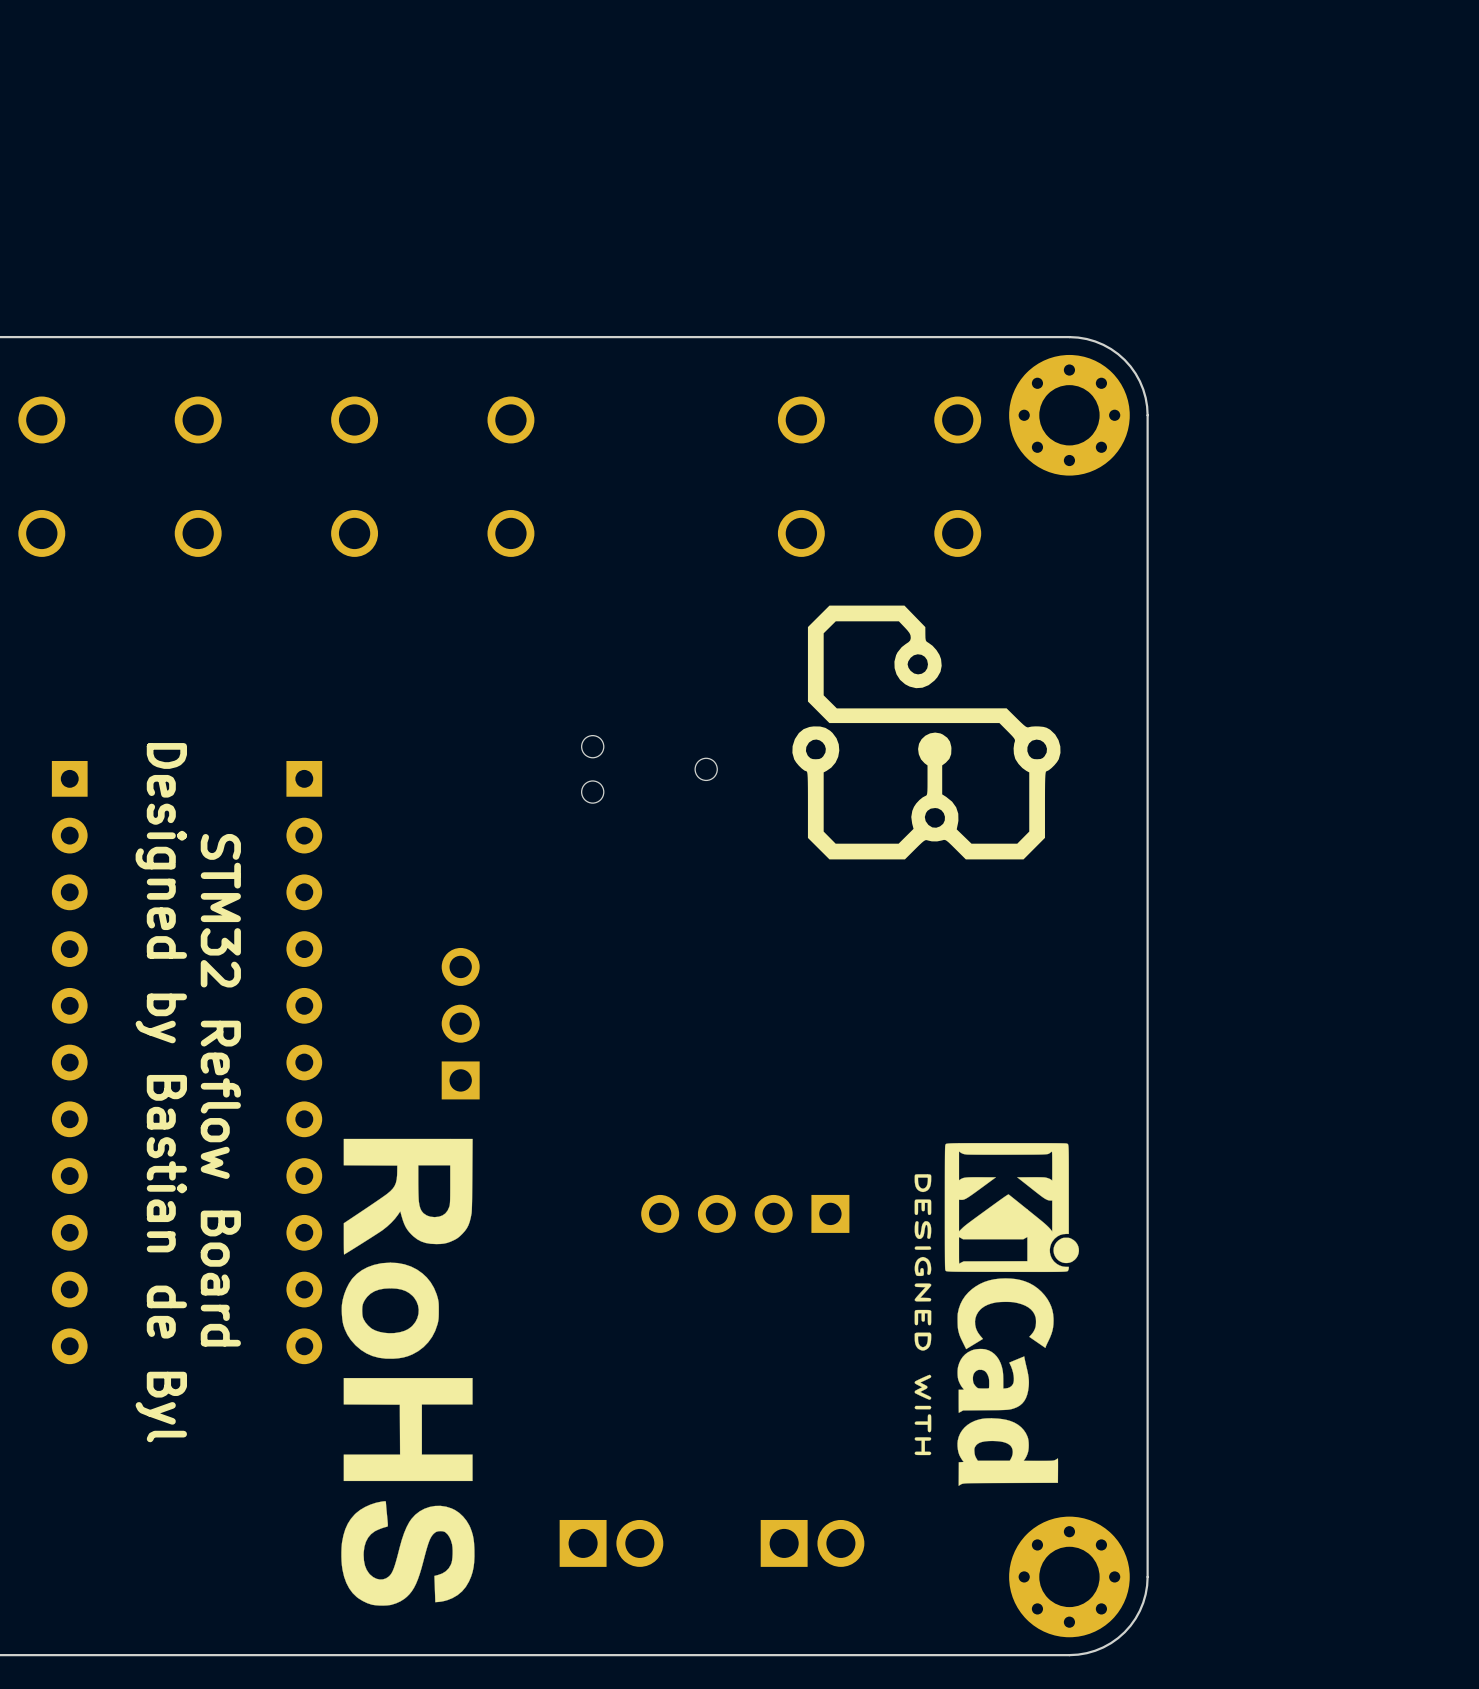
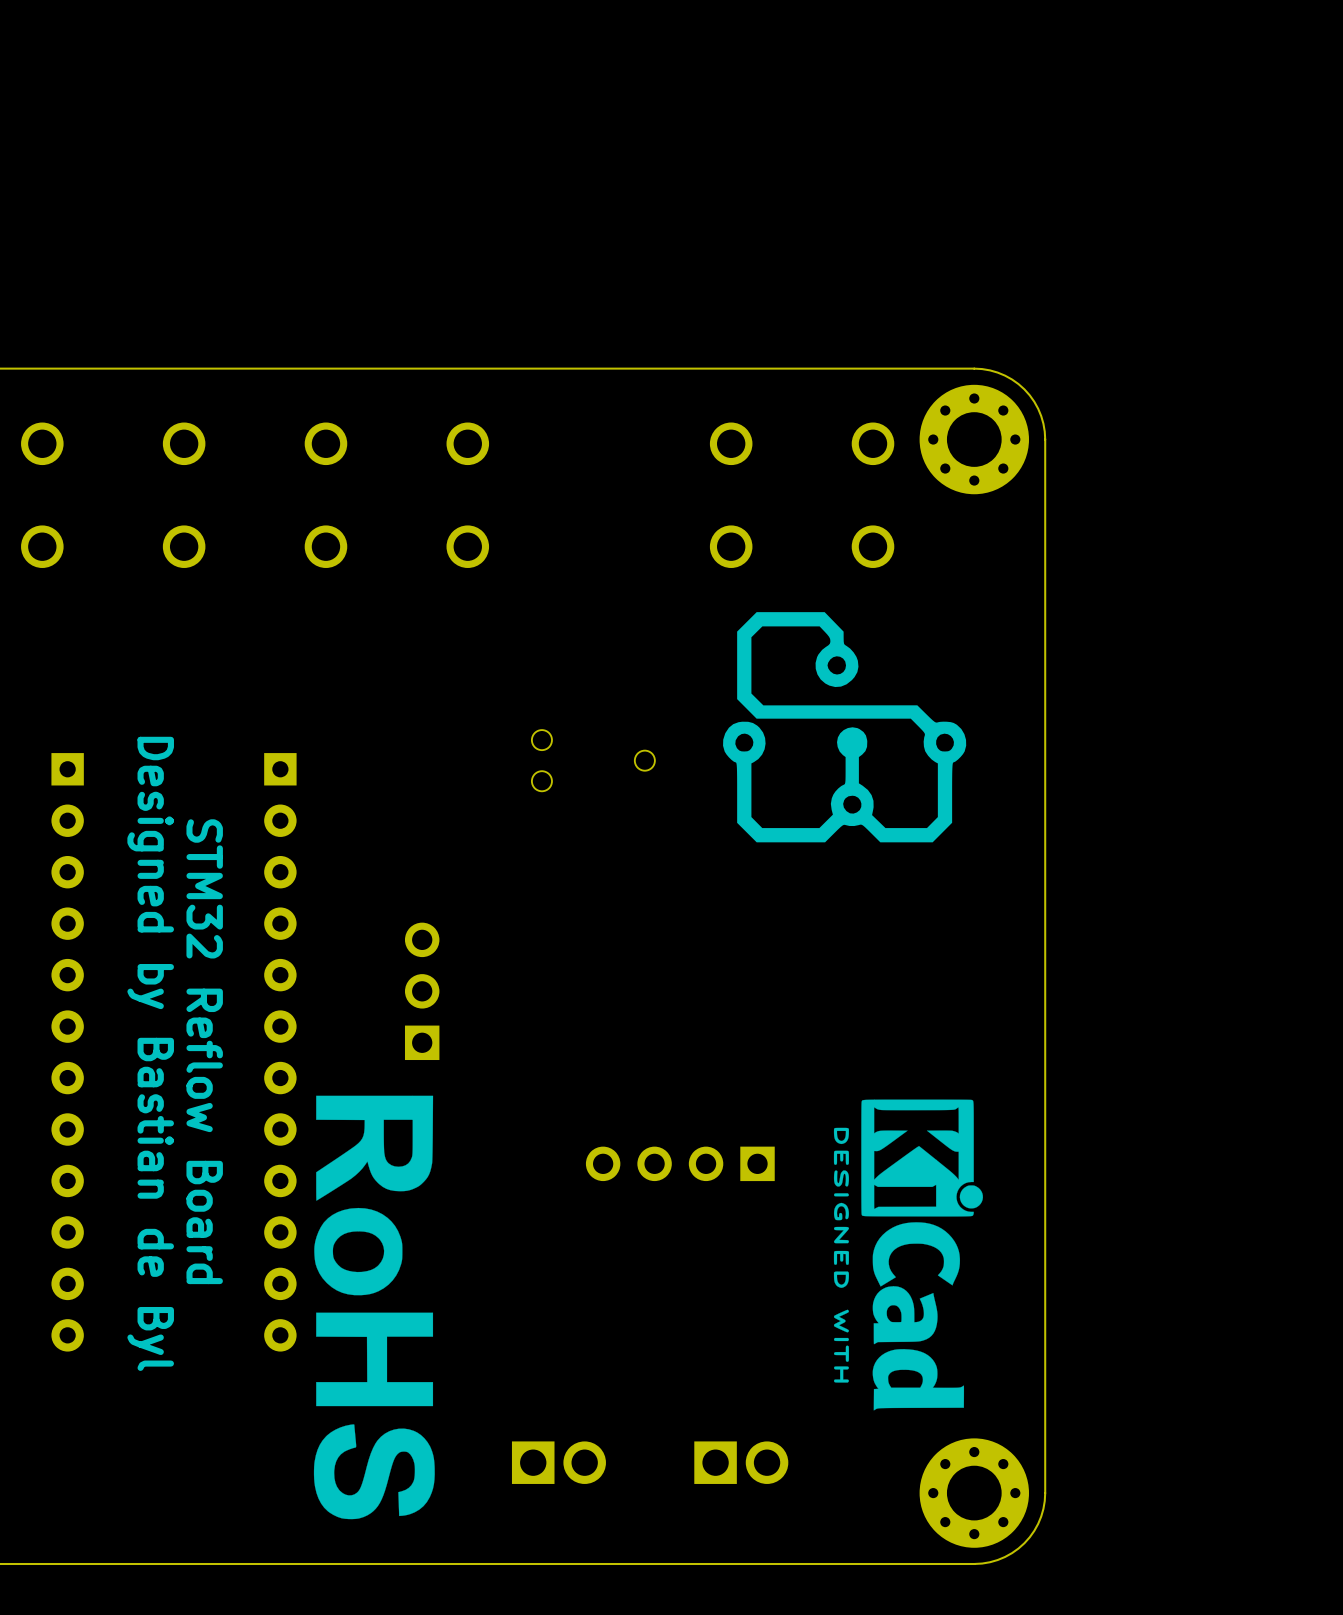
part: none -> (67, 1052)
part: none -> (280, 1052)

